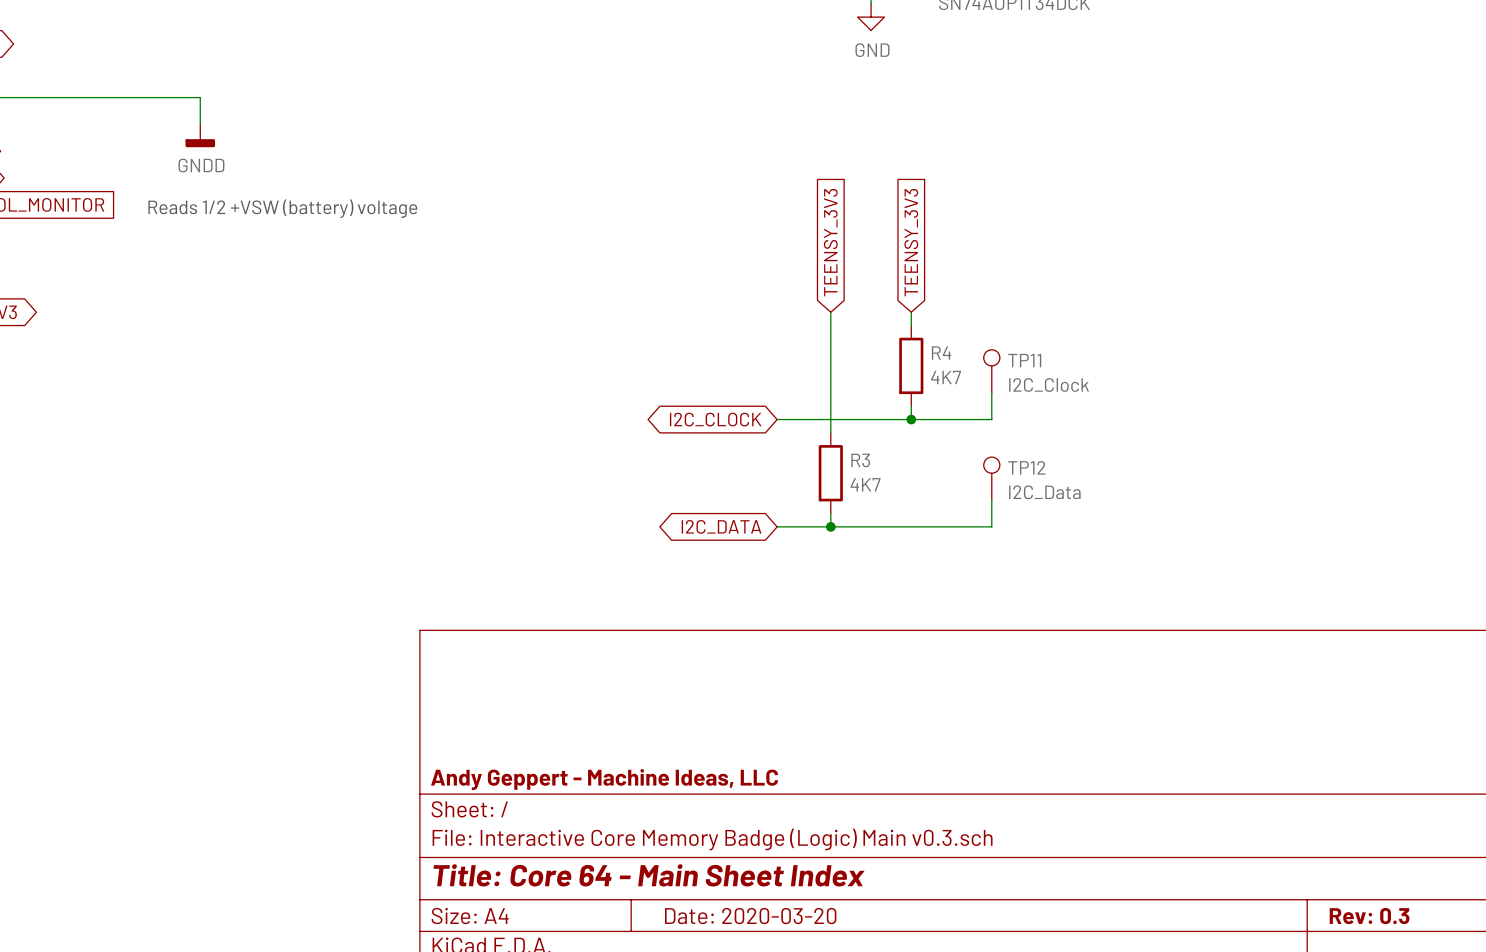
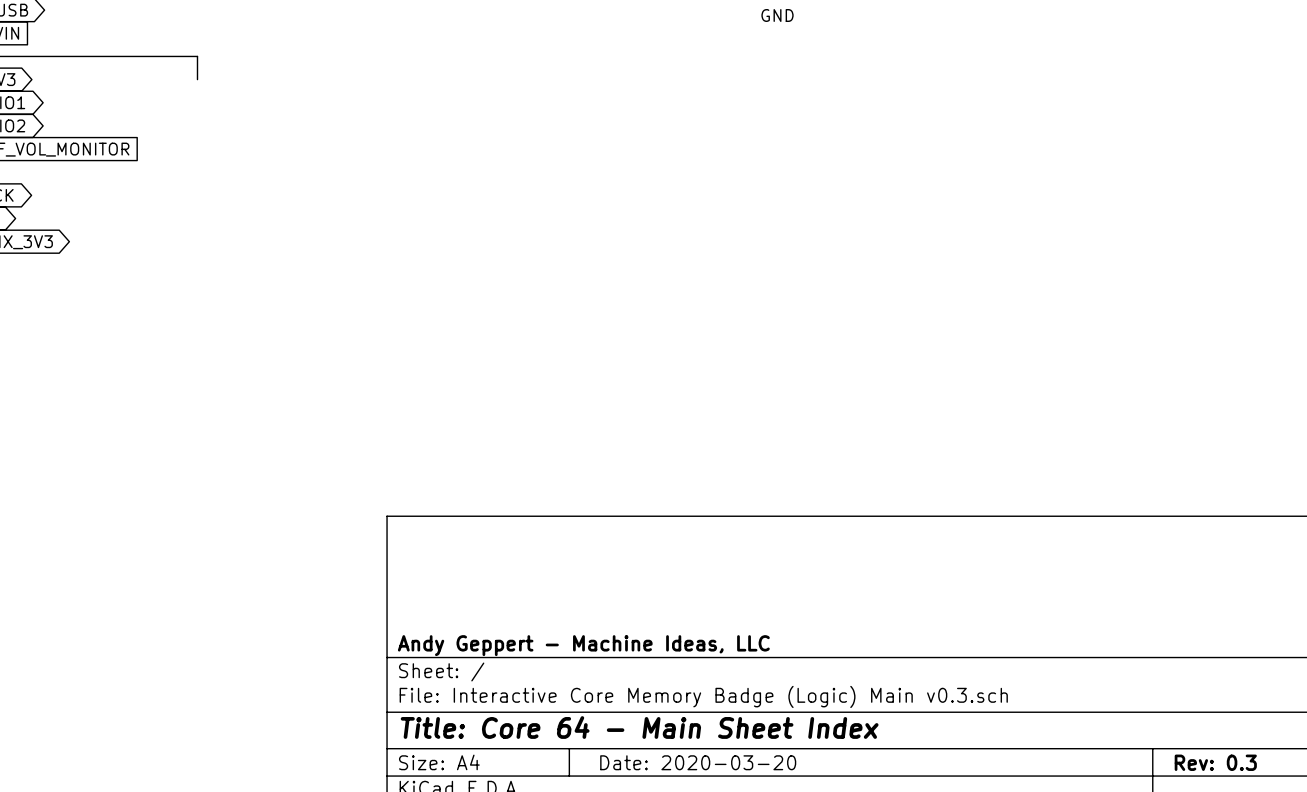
power symbol: GNDD (200, 135) -> none
text: Reads 1/2 +VSW (battery) voltage (282, 208) -> none
global label: TEENSY_3V3 (830, 242) -> none
global label: TEENSY_3V3 (911, 242) -> none
wire: (830, 312) (830, 432) -> none
wire: (911, 312) (911, 325) -> none
R4: 4K7 (911, 365) -> none
TP11: I2C_Clock (991, 371) -> none
wire: (991, 392) (991, 419) (777, 419) -> none
wire: (911, 406) (911, 419) -> none
global label: I2C_CLOCK (715, 419) -> none
junction: (911, 419) -> none
R3: 4K7 (830, 473) -> none
TP12: I2C_Data (991, 478) -> none
wire: (991, 500) (991, 526) (777, 526) -> none
wire: (830, 513) (830, 526) -> none
global label: I2C_DATA (721, 526) -> none
junction: (830, 526) -> none

